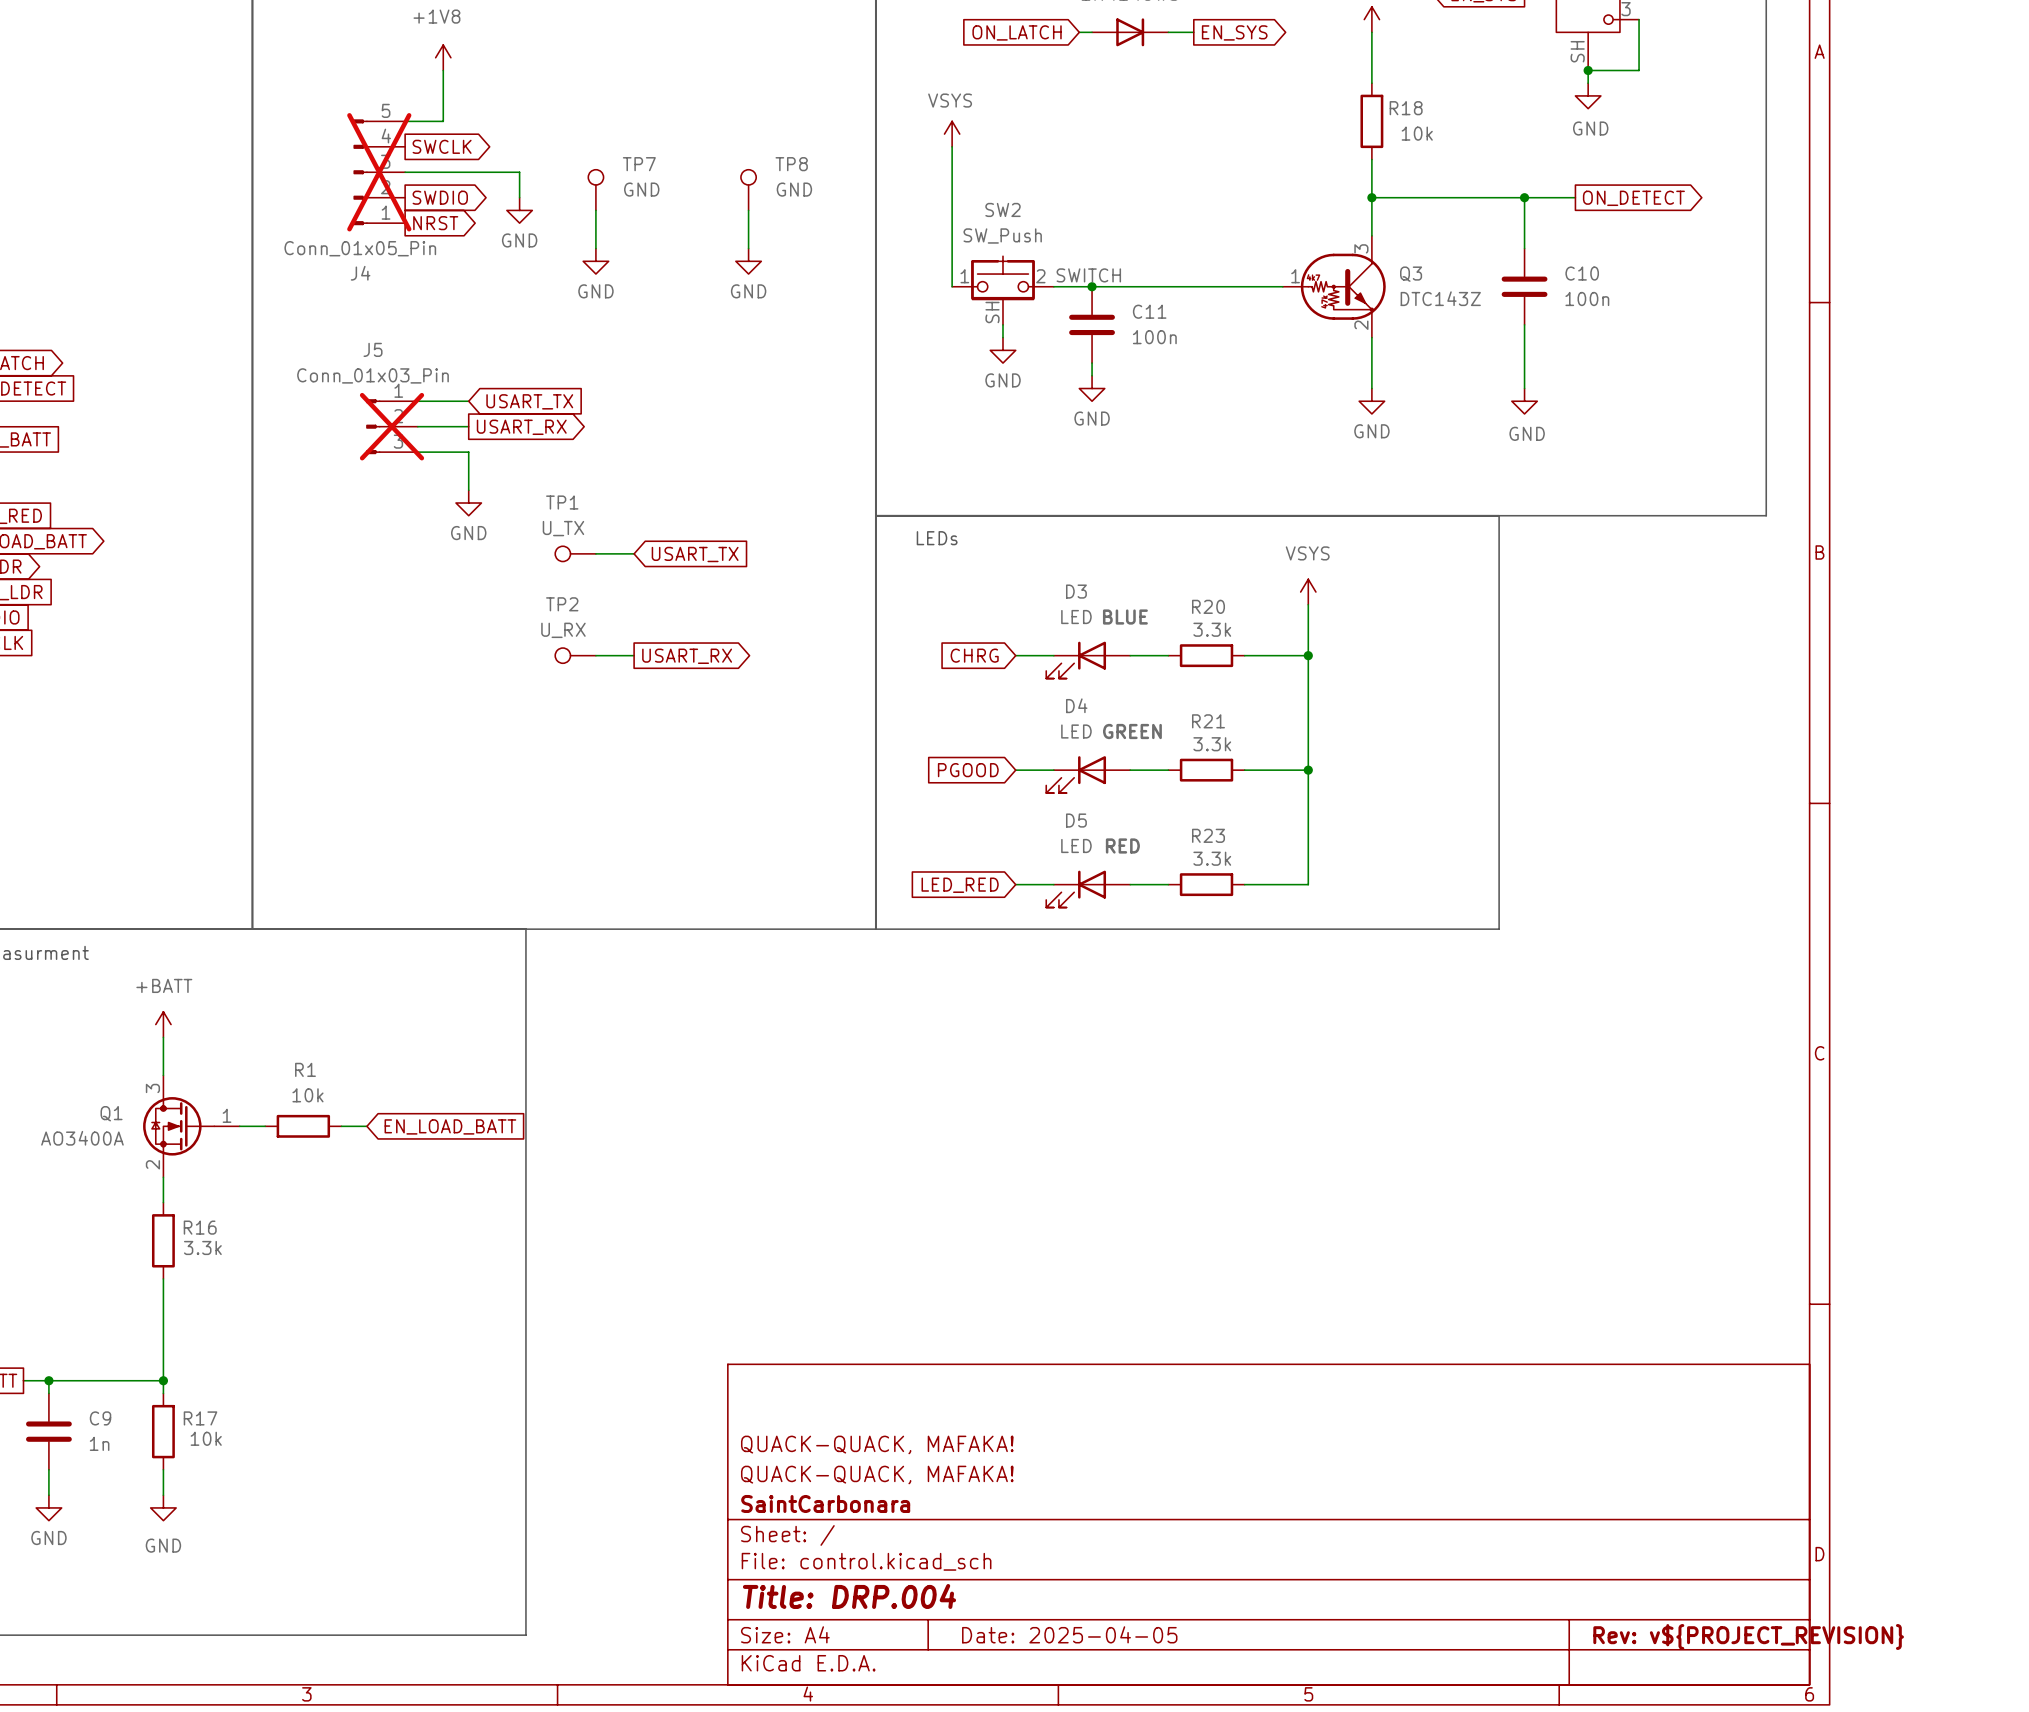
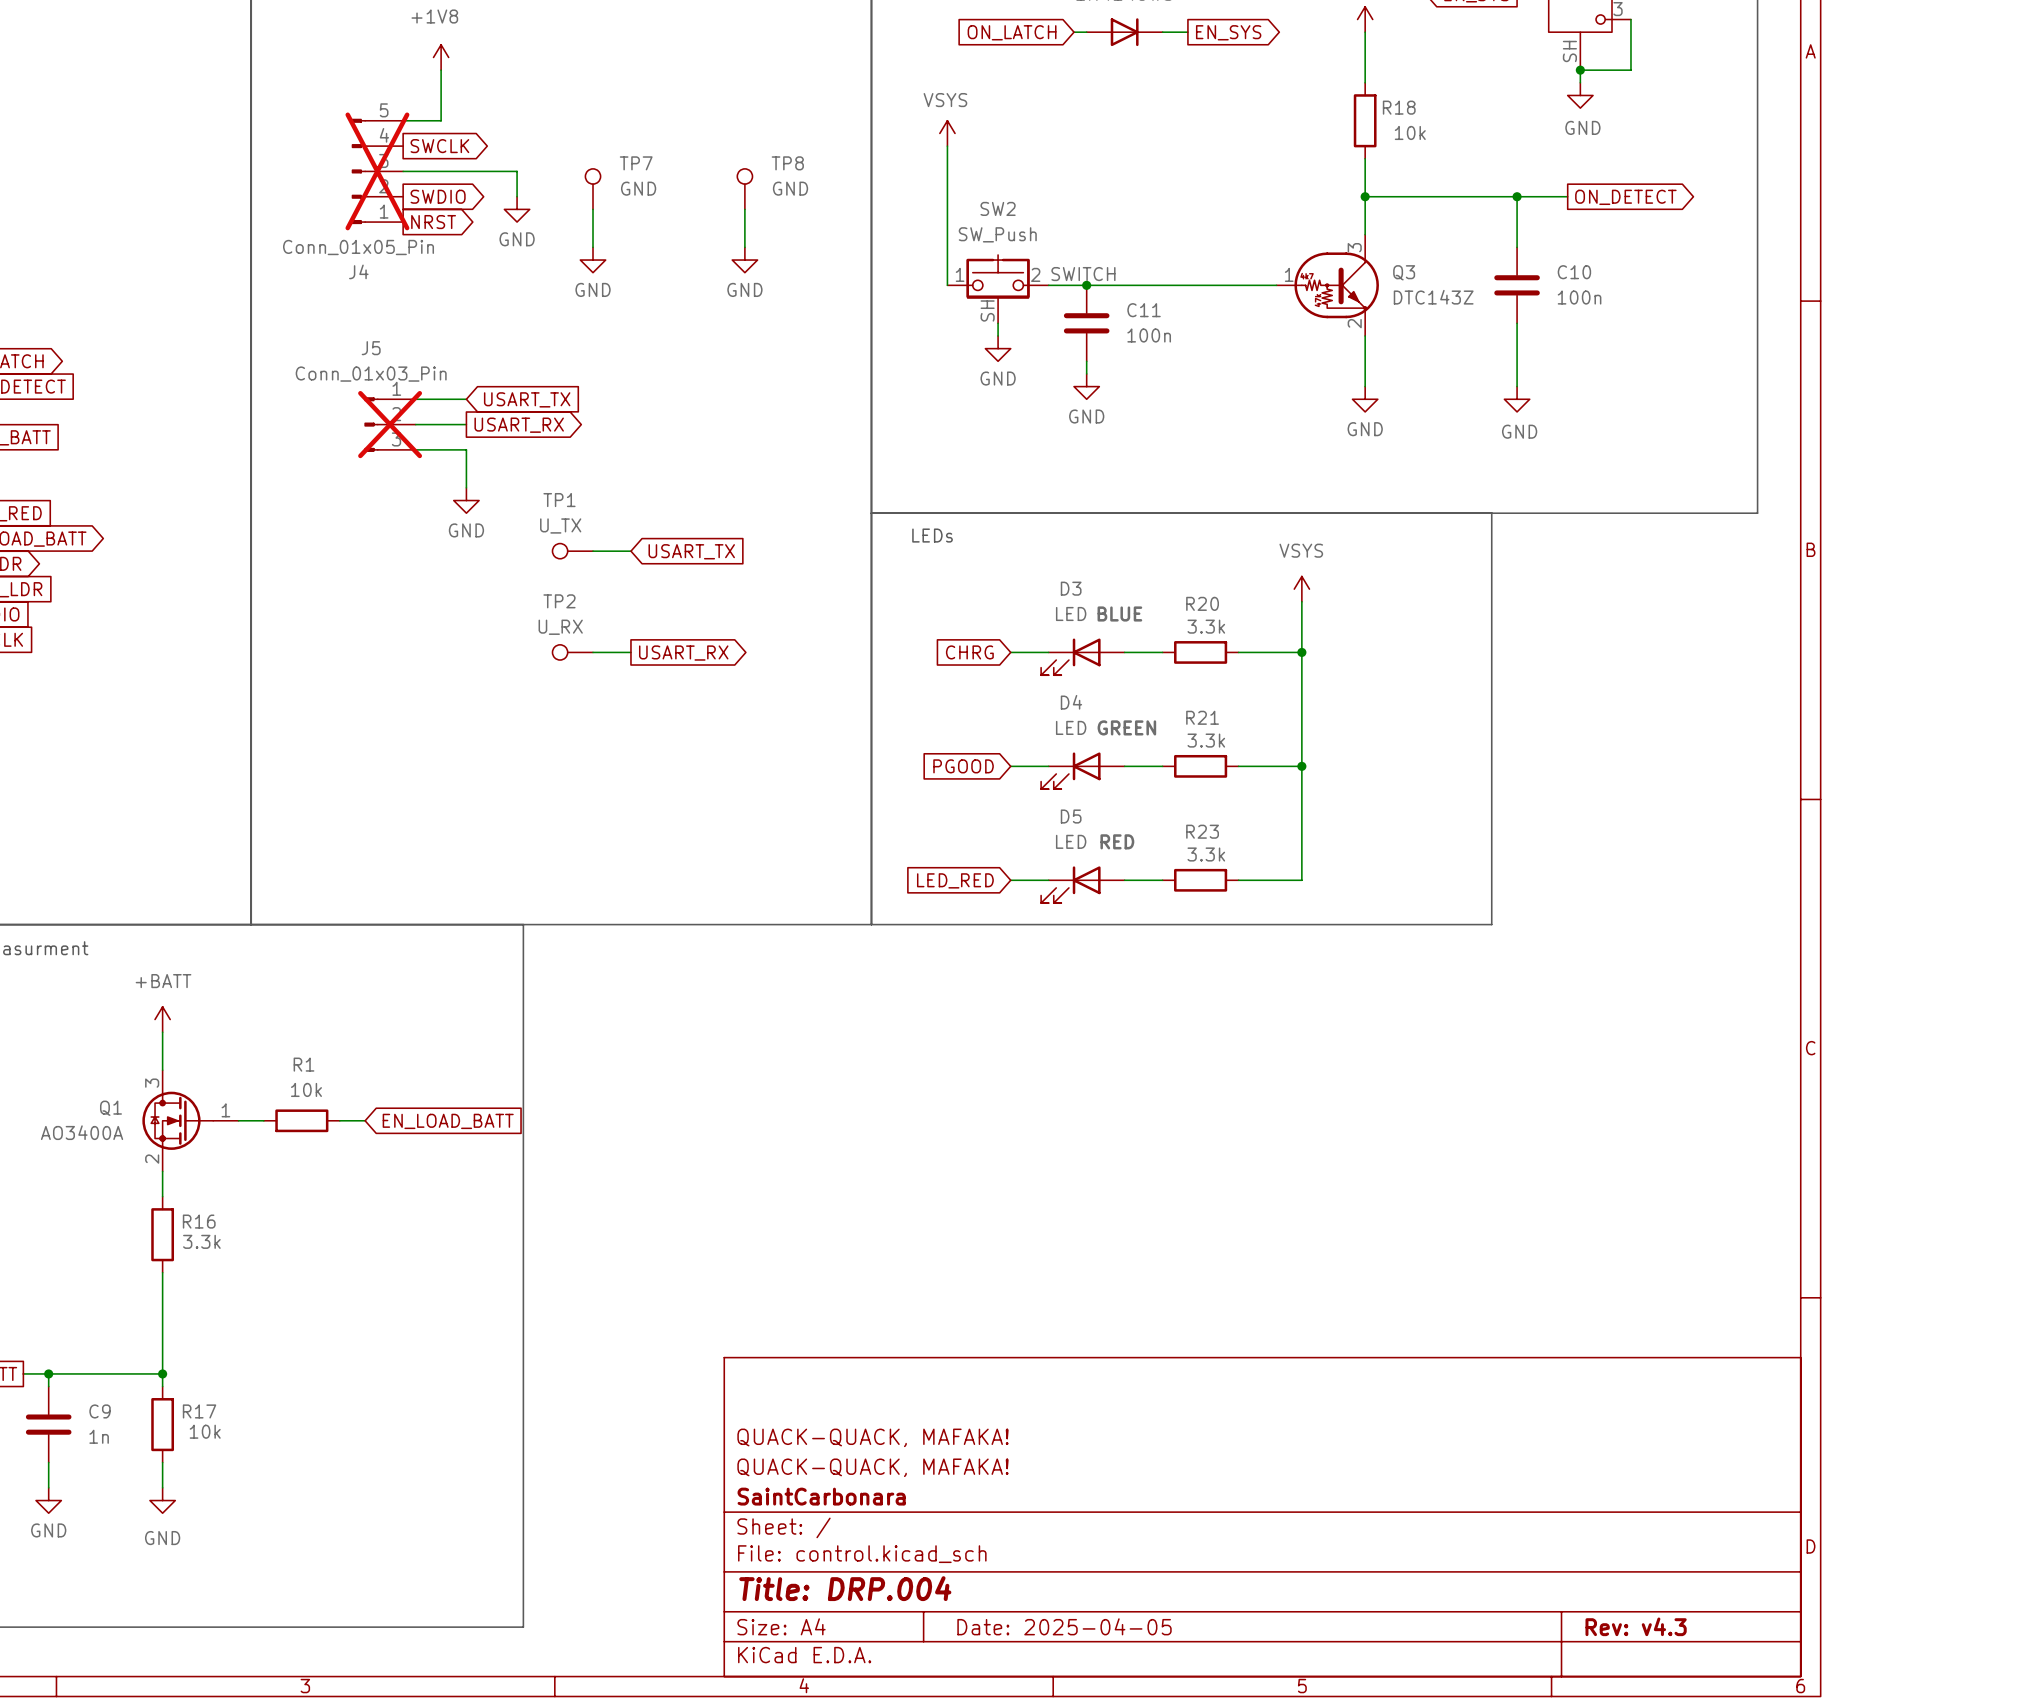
title block: Rev: v${PROJECT_REVISION} (1748, 1636) -> Rev: v4.3 (1636, 1626)

